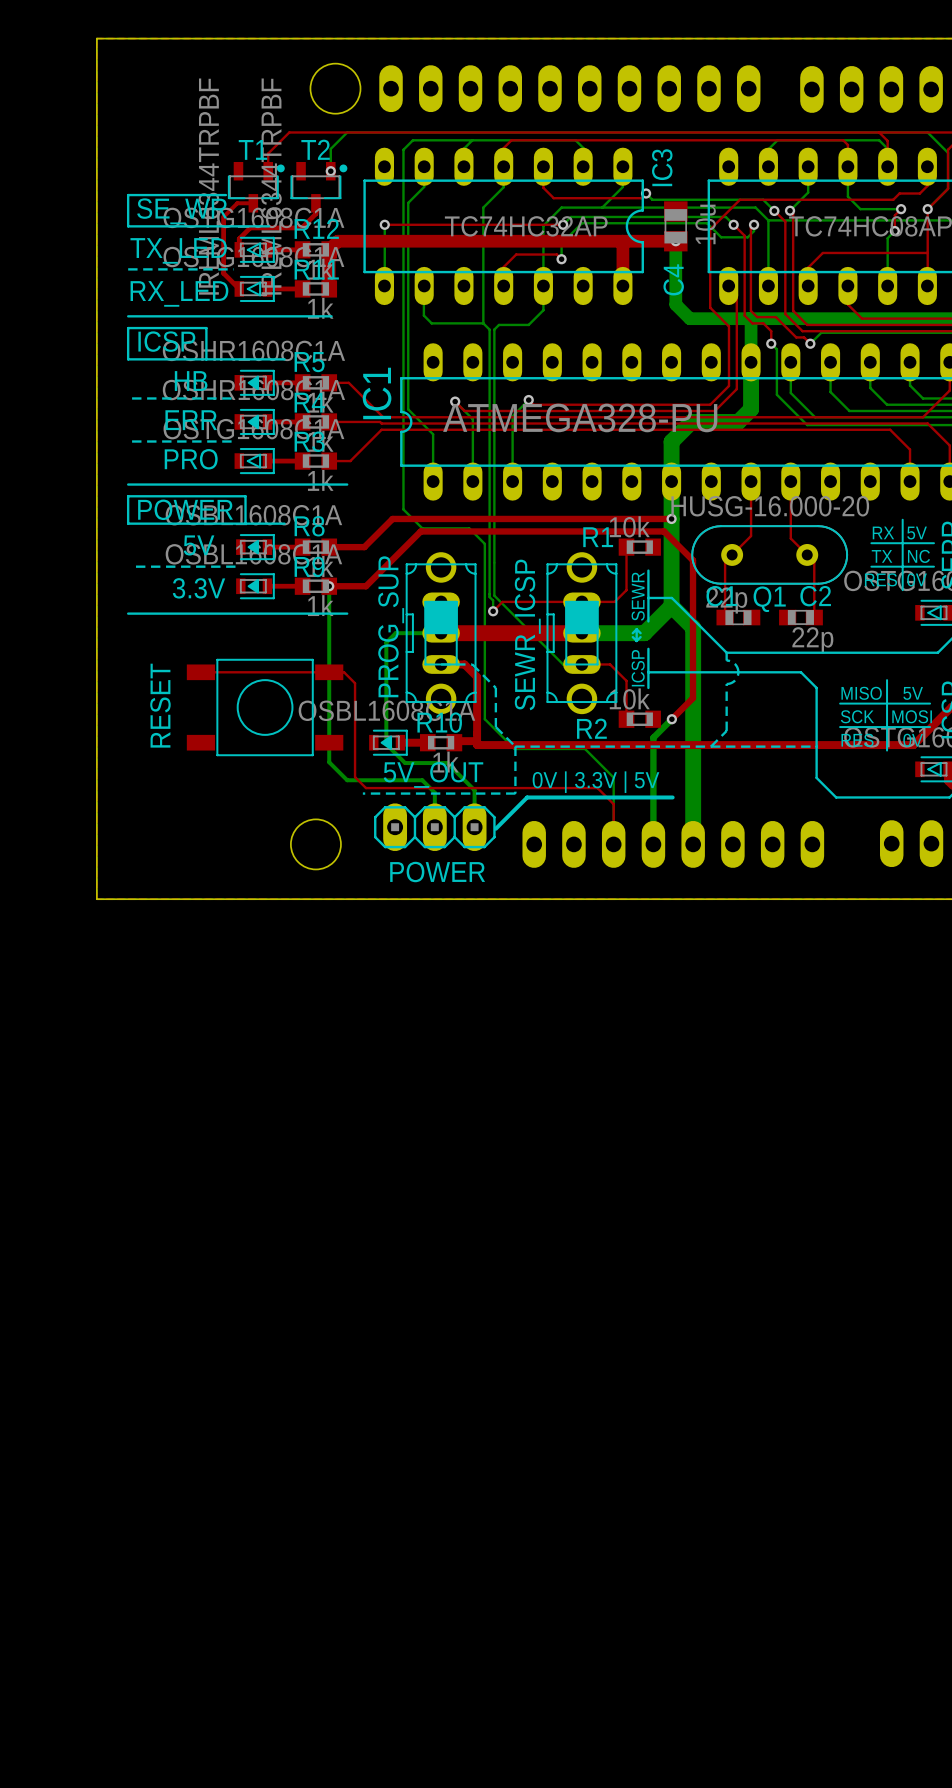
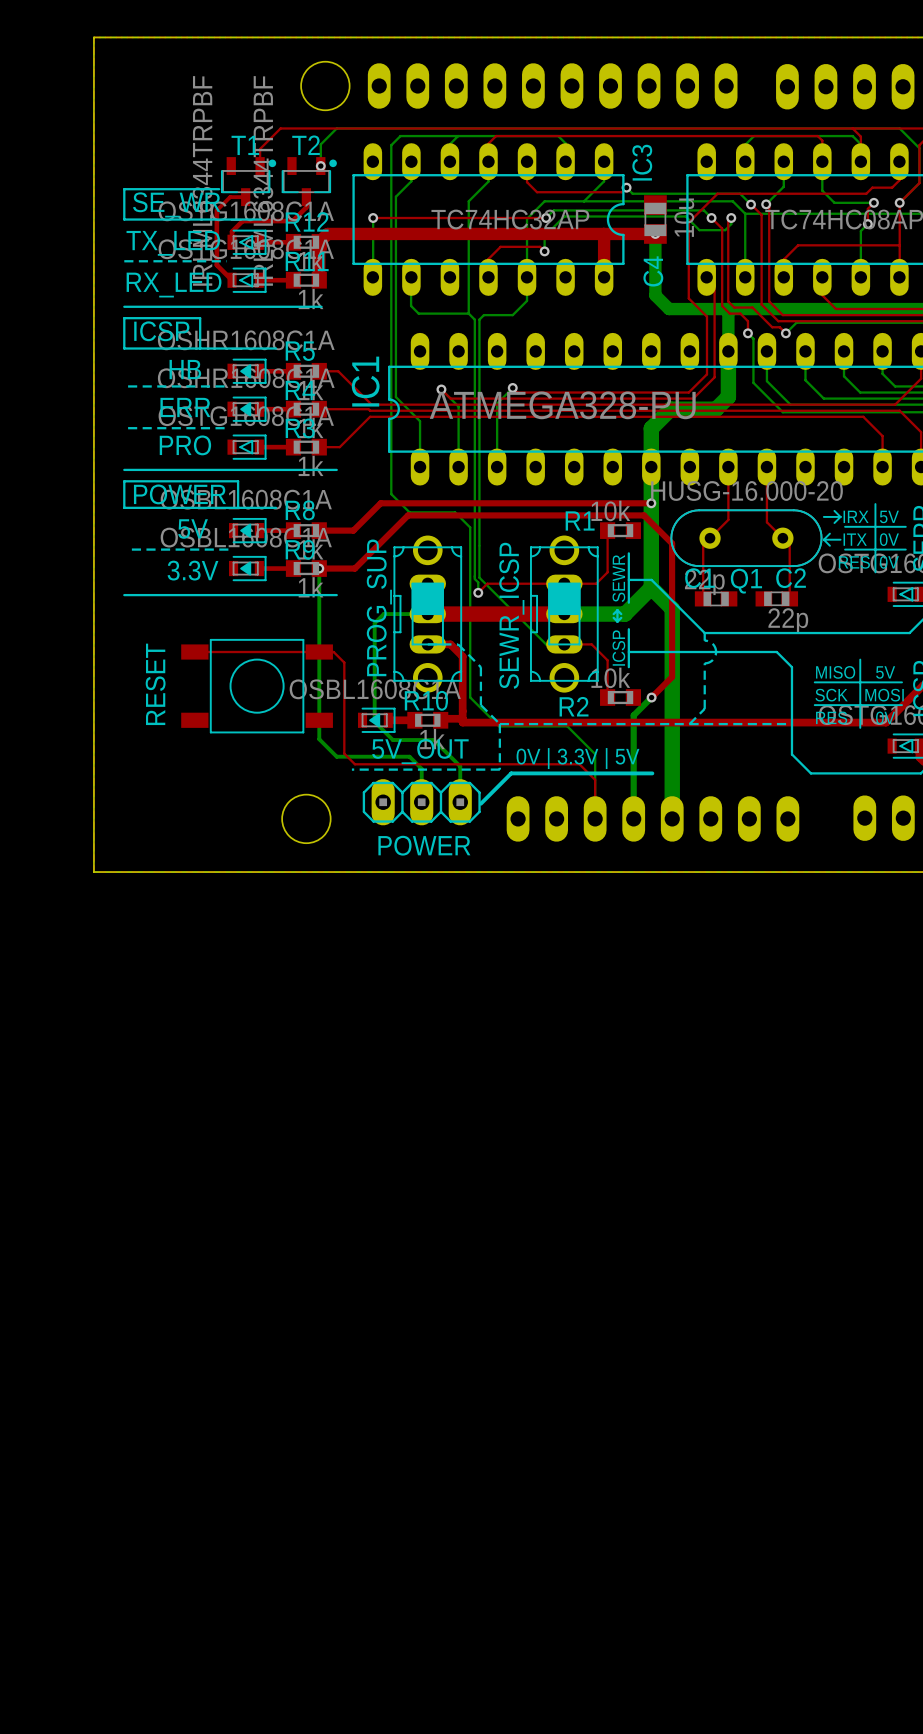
line: none -> (834, 510) (840, 516)
text: RX (883, 532) -> IRX (856, 516)
line: none -> (823, 516) (840, 516)
line: none -> (840, 516) (834, 523)
line: none -> (829, 533) (823, 539)
line: none -> (823, 539) (840, 539)
line: none -> (823, 539) (829, 545)
text: TX (882, 556) -> ITX (855, 539)
text: NC (918, 556) -> 0V (889, 539)

